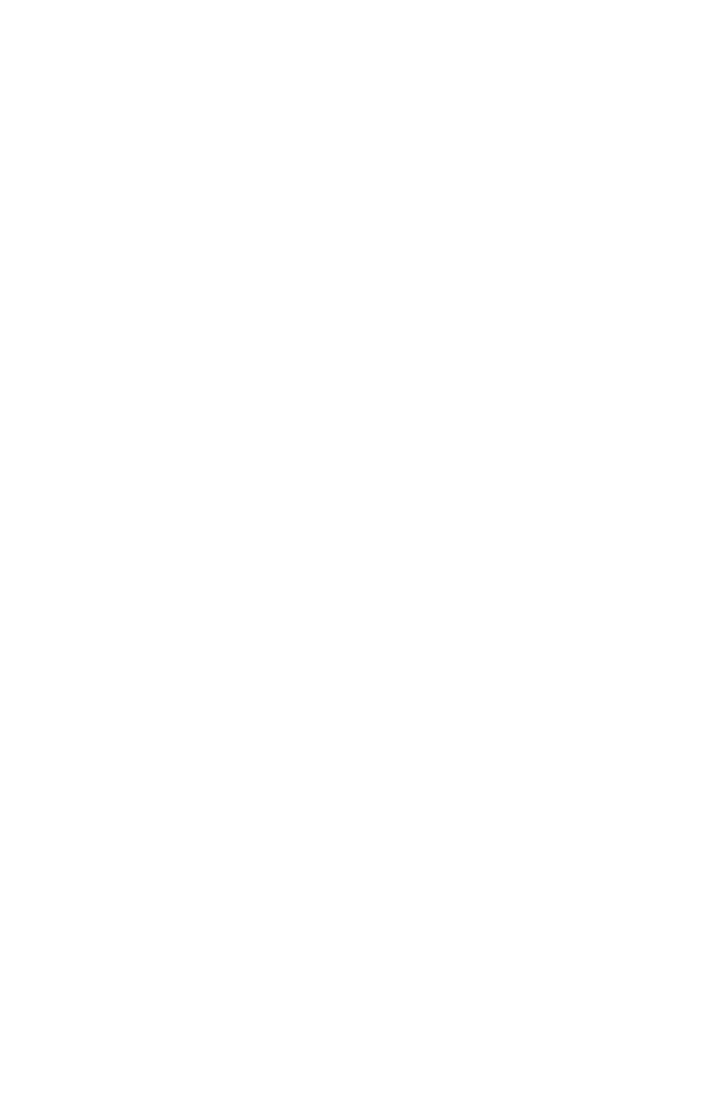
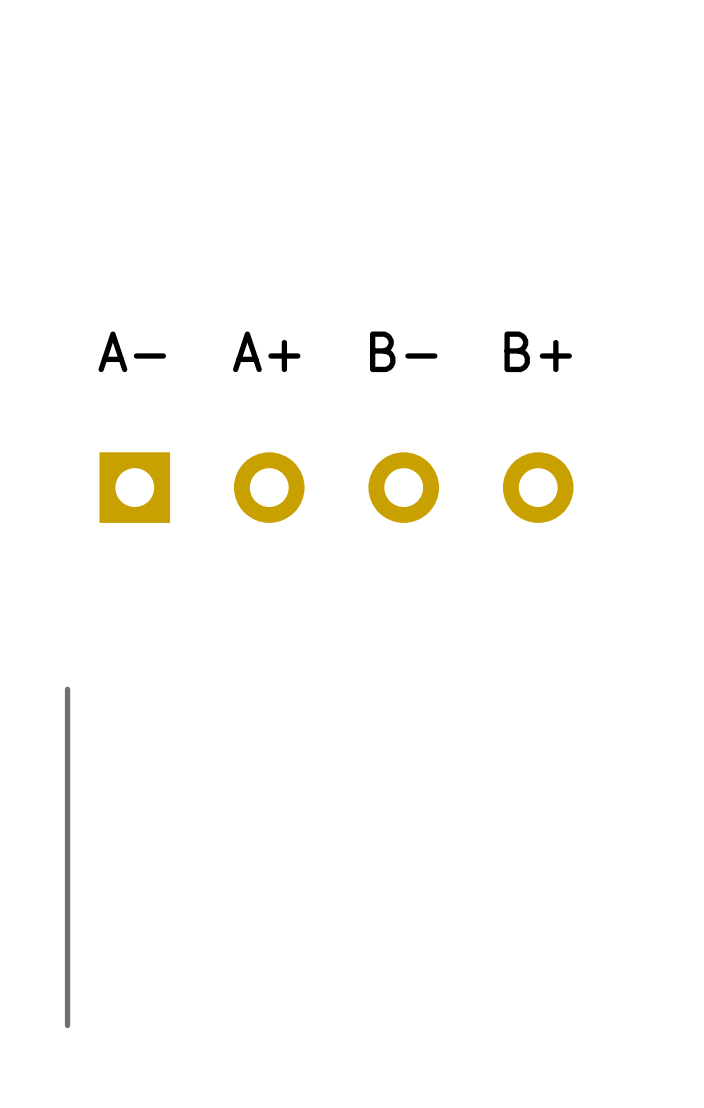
text: none -> A- (132, 351)
text: none -> A+ (266, 351)
text: none -> B- (403, 351)
text: none -> B+ (538, 351)
part: none -> (336, 487)
line: none -> (67, 689) (67, 1025)

